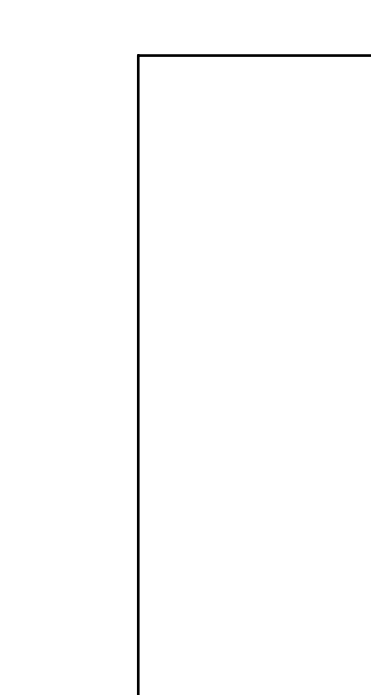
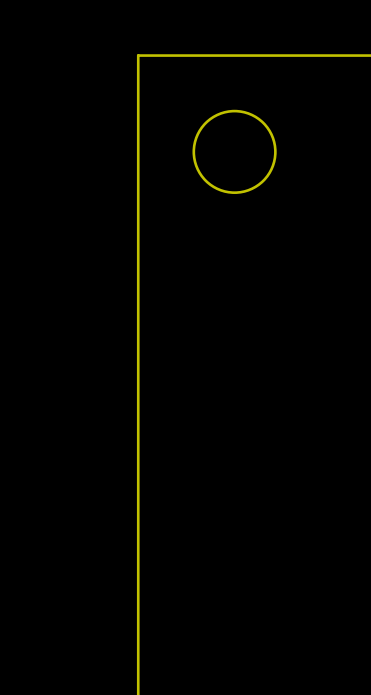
round board edge: none -> [192, 109, 277, 194]

